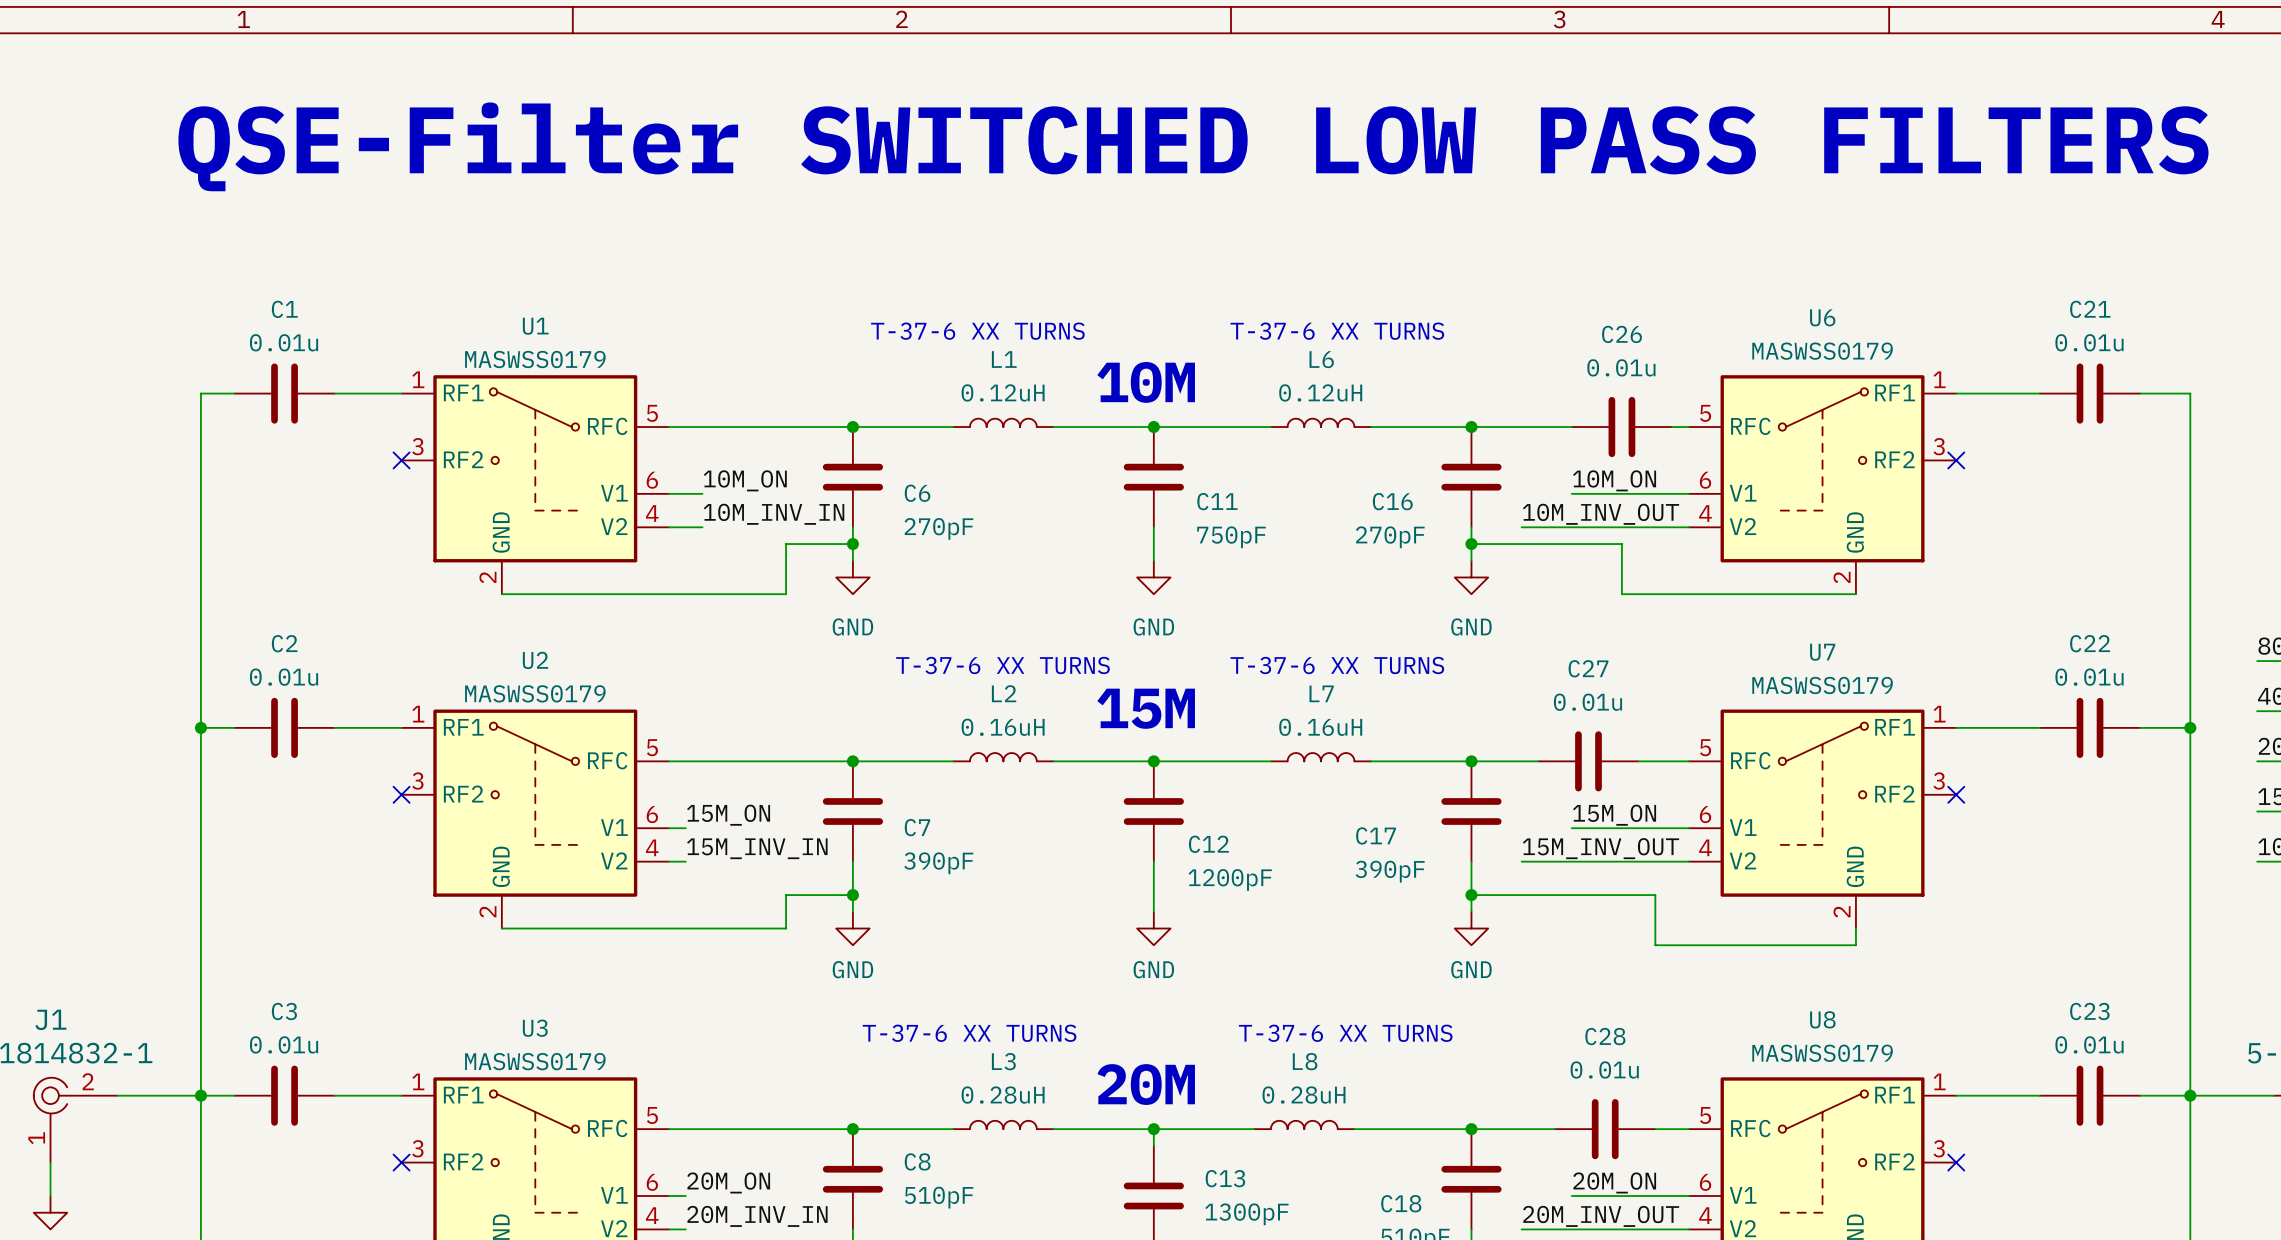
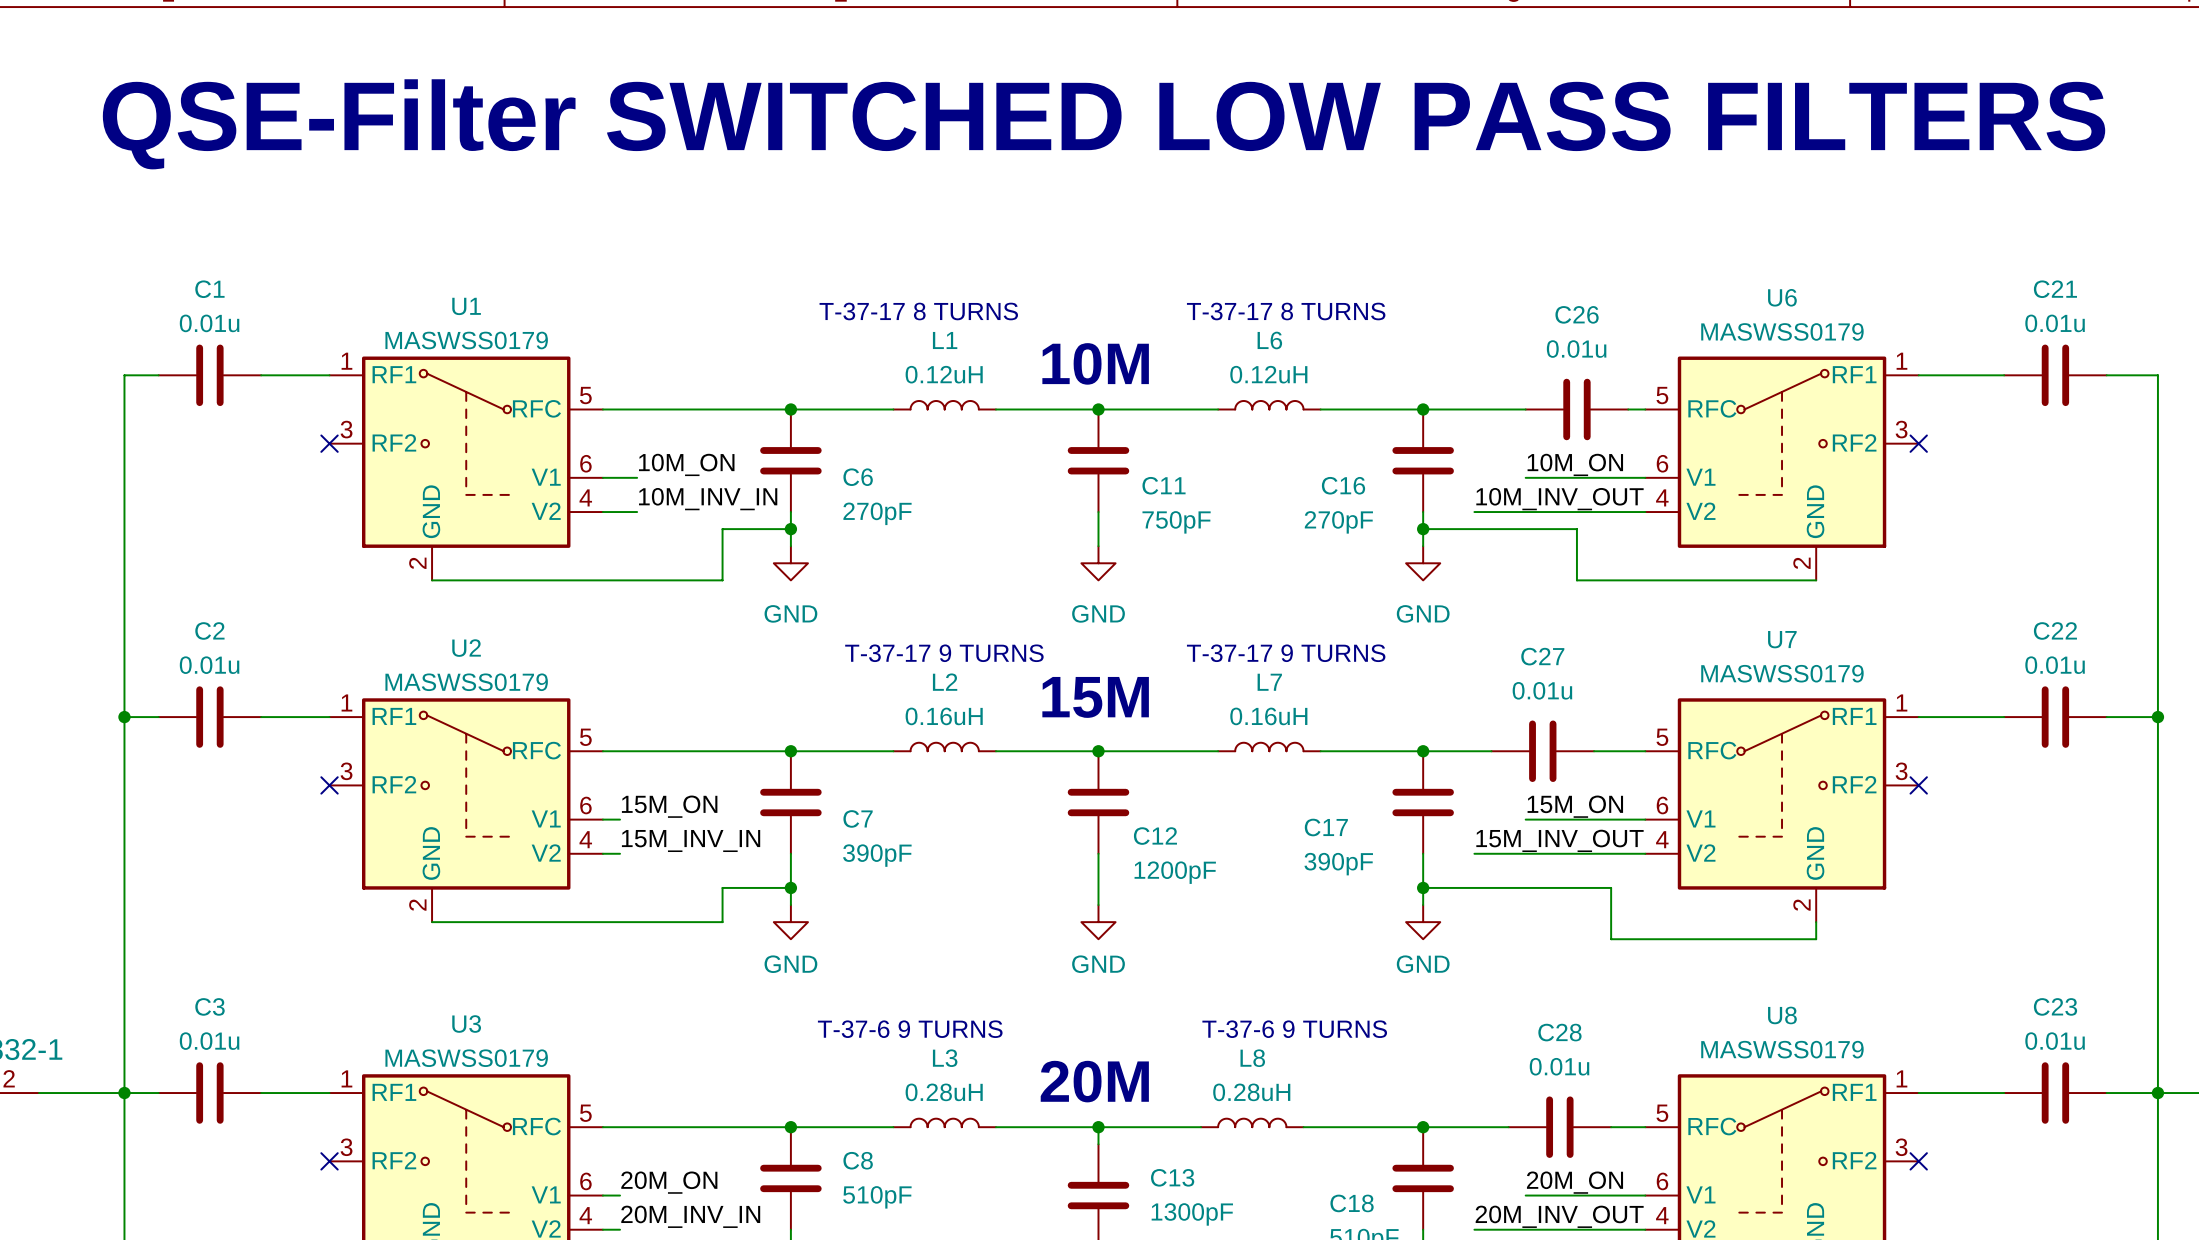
text: T-37-6 XX TURNS (977, 331) -> T-37-17 8 TURNS (918, 311)
text: T-37-6 XX TURNS (1337, 331) -> T-37-17 8 TURNS (1286, 311)
text: T-37-6 XX TURNS (1002, 665) -> T-37-17 9 TURNS (944, 653)
text: T-37-6 XX TURNS (1337, 665) -> T-37-17 9 TURNS (1286, 653)
text: T-37-6 XX TURNS (969, 1033) -> T-37-6 9 TURNS (910, 1029)
text: T-37-6 XX TURNS (1345, 1033) -> T-37-6 9 TURNS (1294, 1029)

